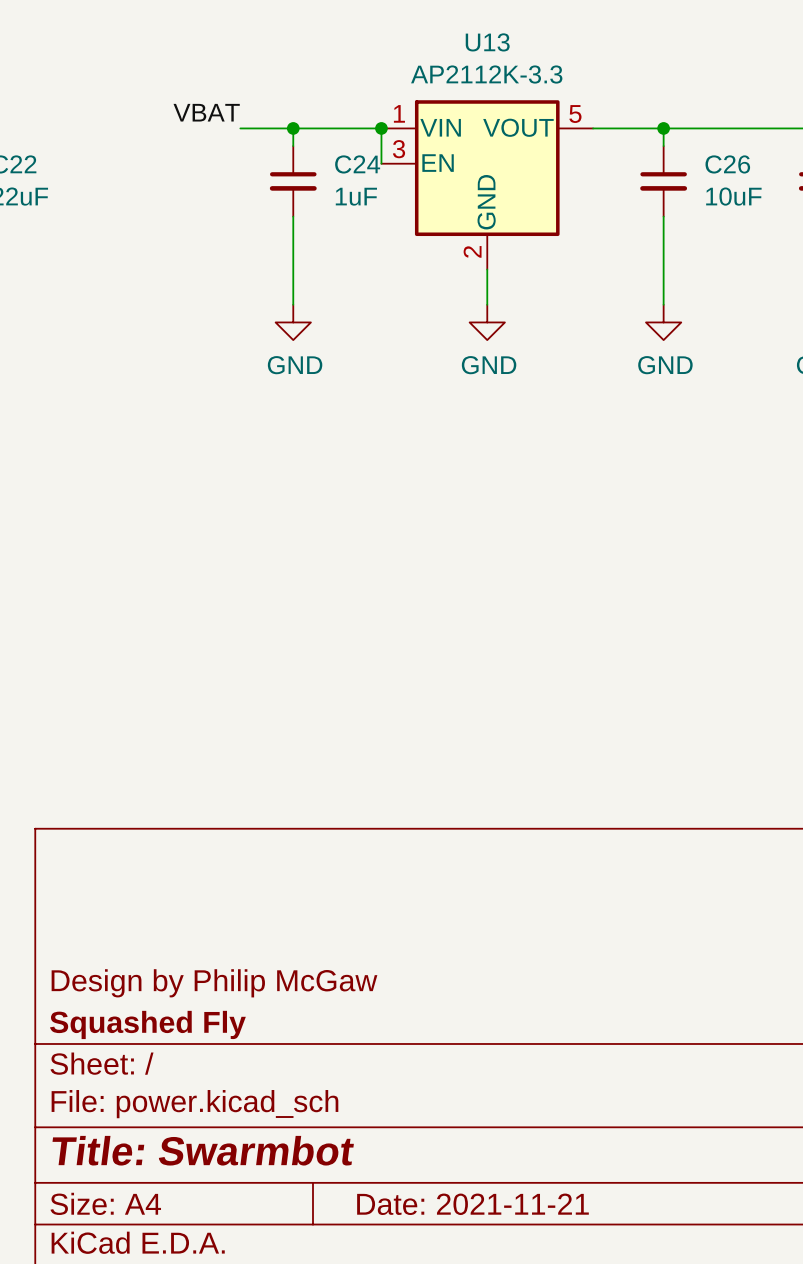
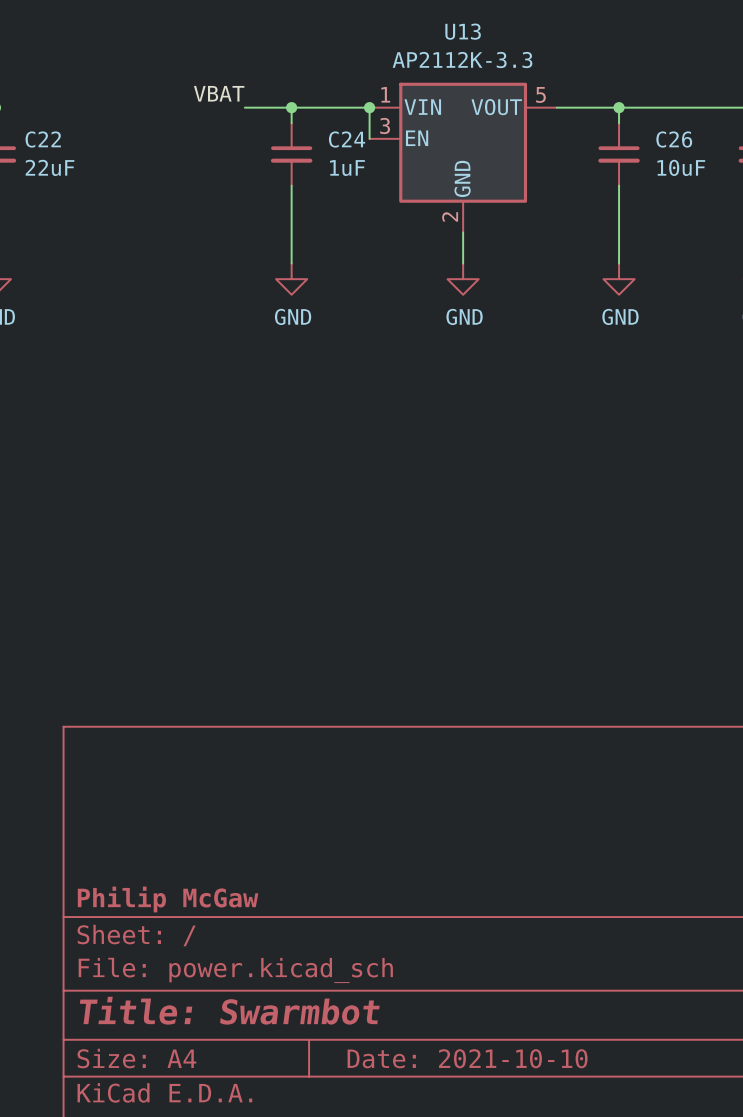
title block: Design by Philip McGaw (214, 983) -> none
title block: Squashed Fly (147, 1024) -> Philip McGaw (168, 899)
title block: Date: 2021-11-21 (472, 1204) -> Date: 2021-10-10 (467, 1058)

